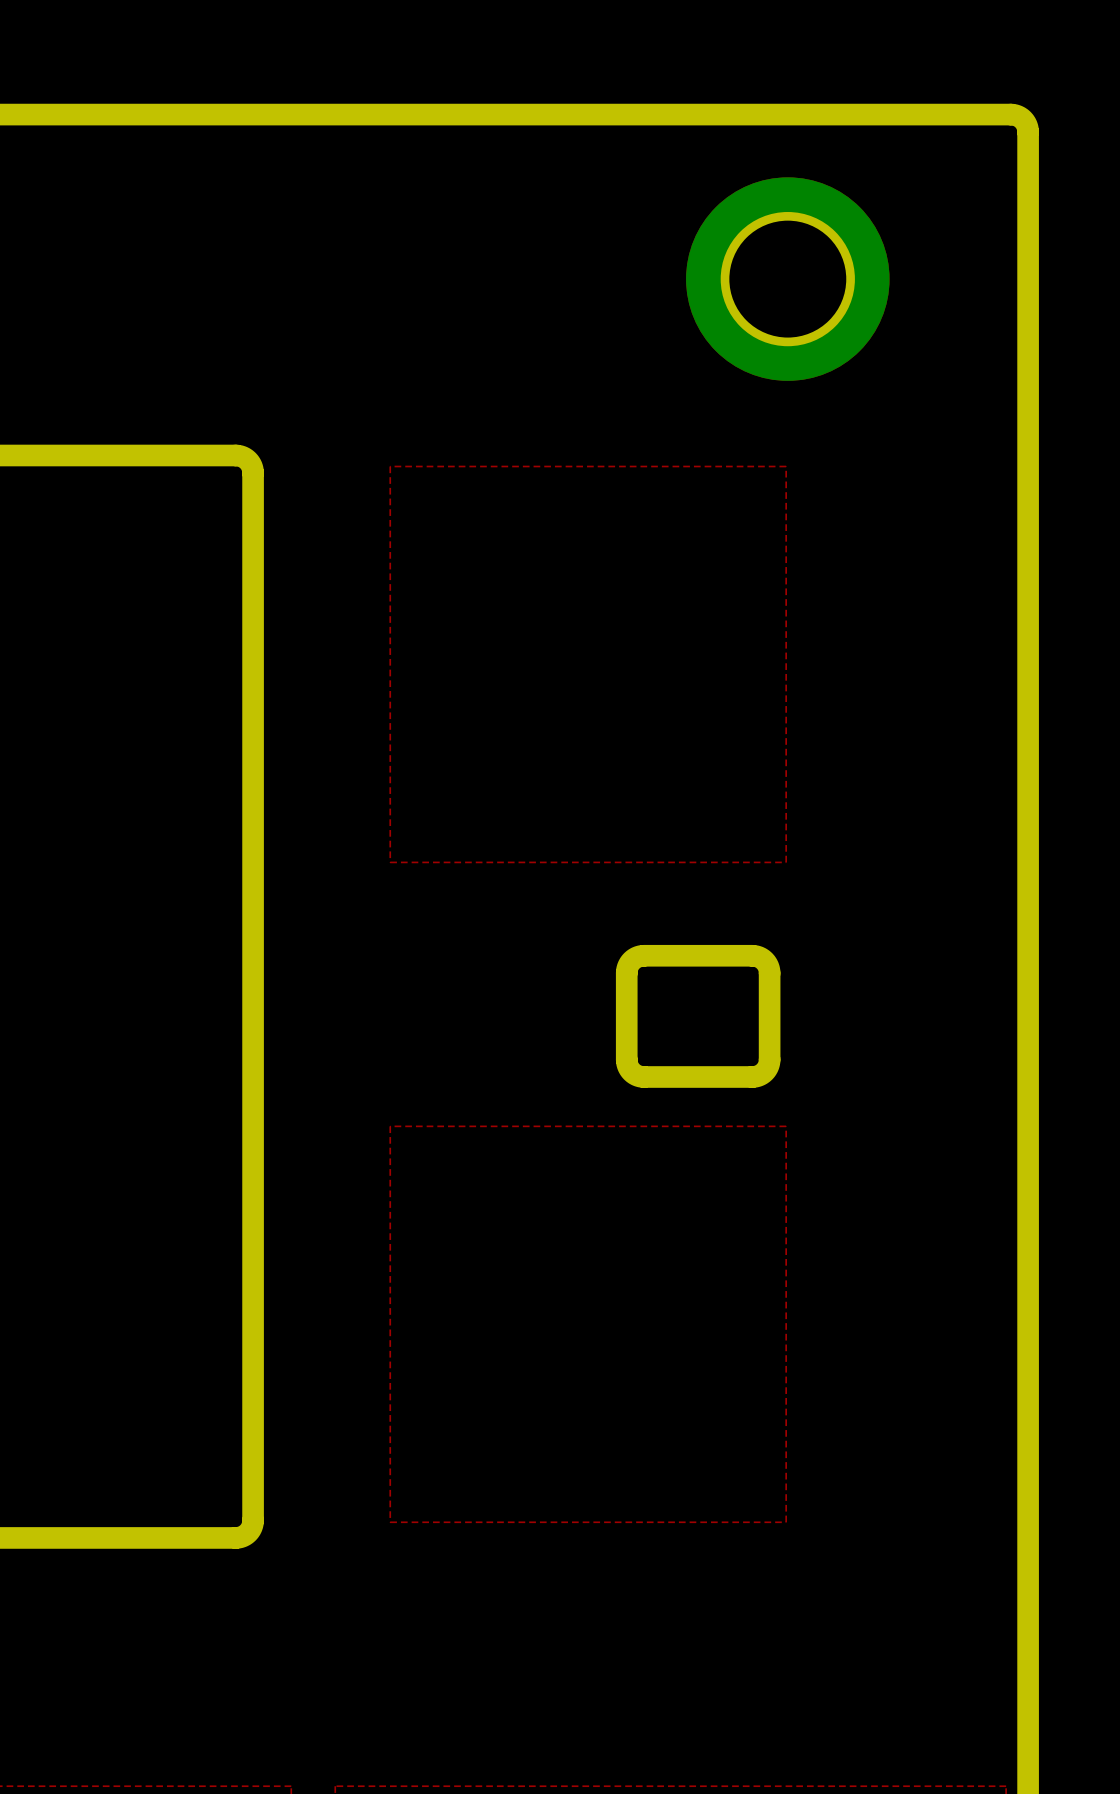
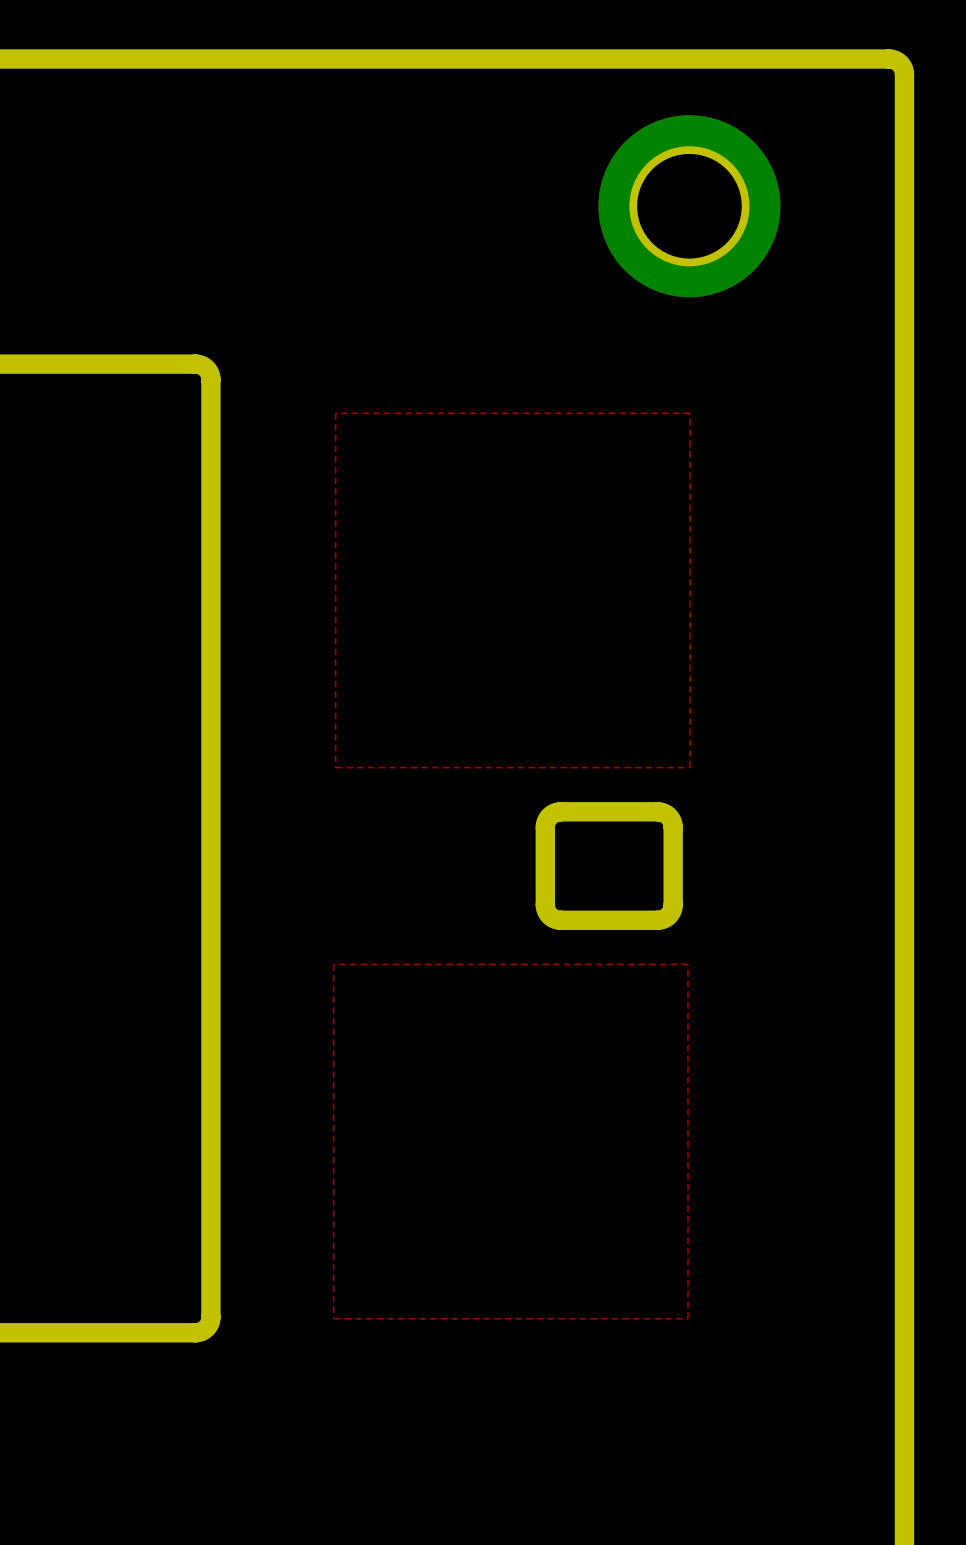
top zone outline: (786, 466) (390, 466) (390, 862) (786, 862) (786, 466) -> (689, 413) (335, 413) (335, 767) (689, 767) (689, 413)

